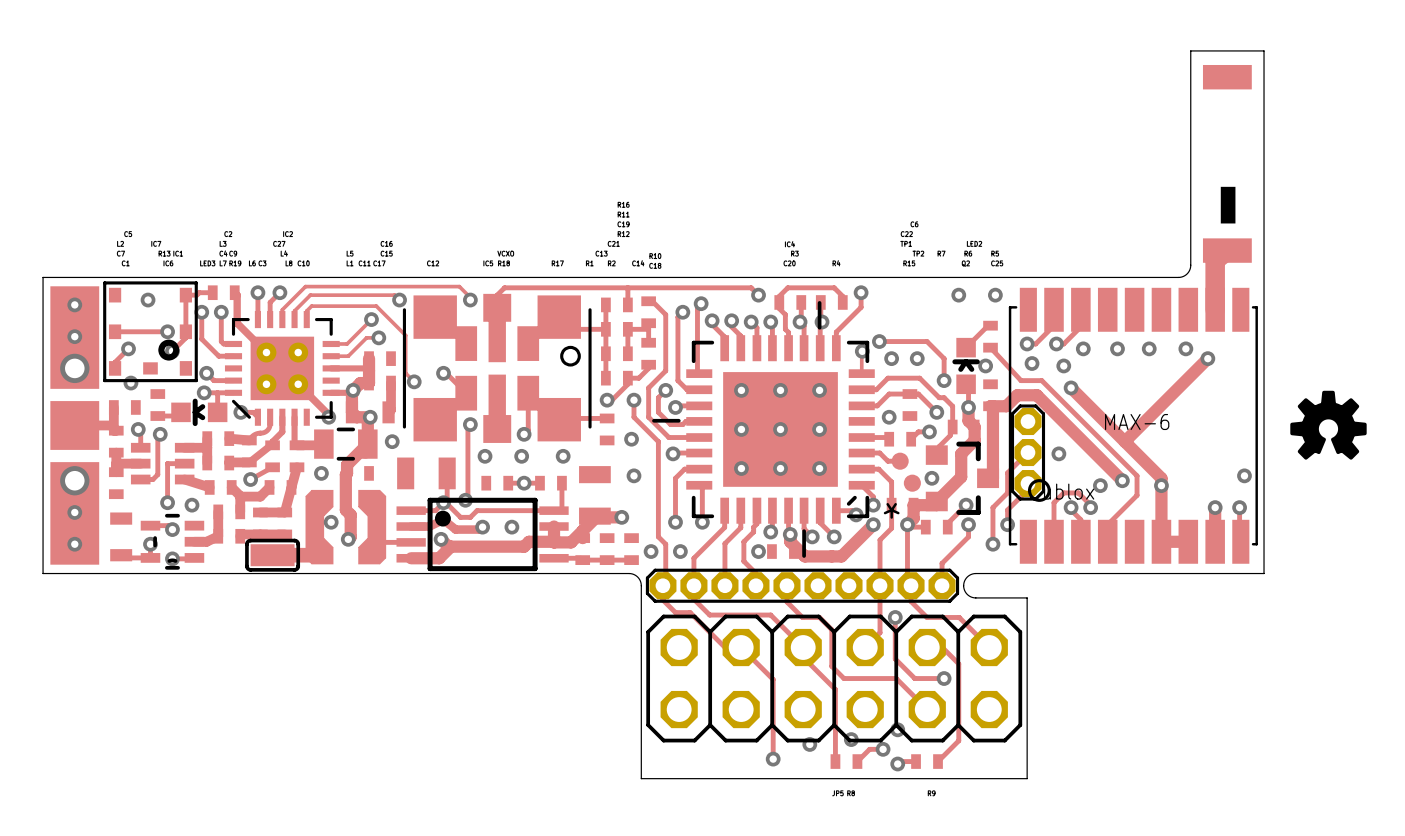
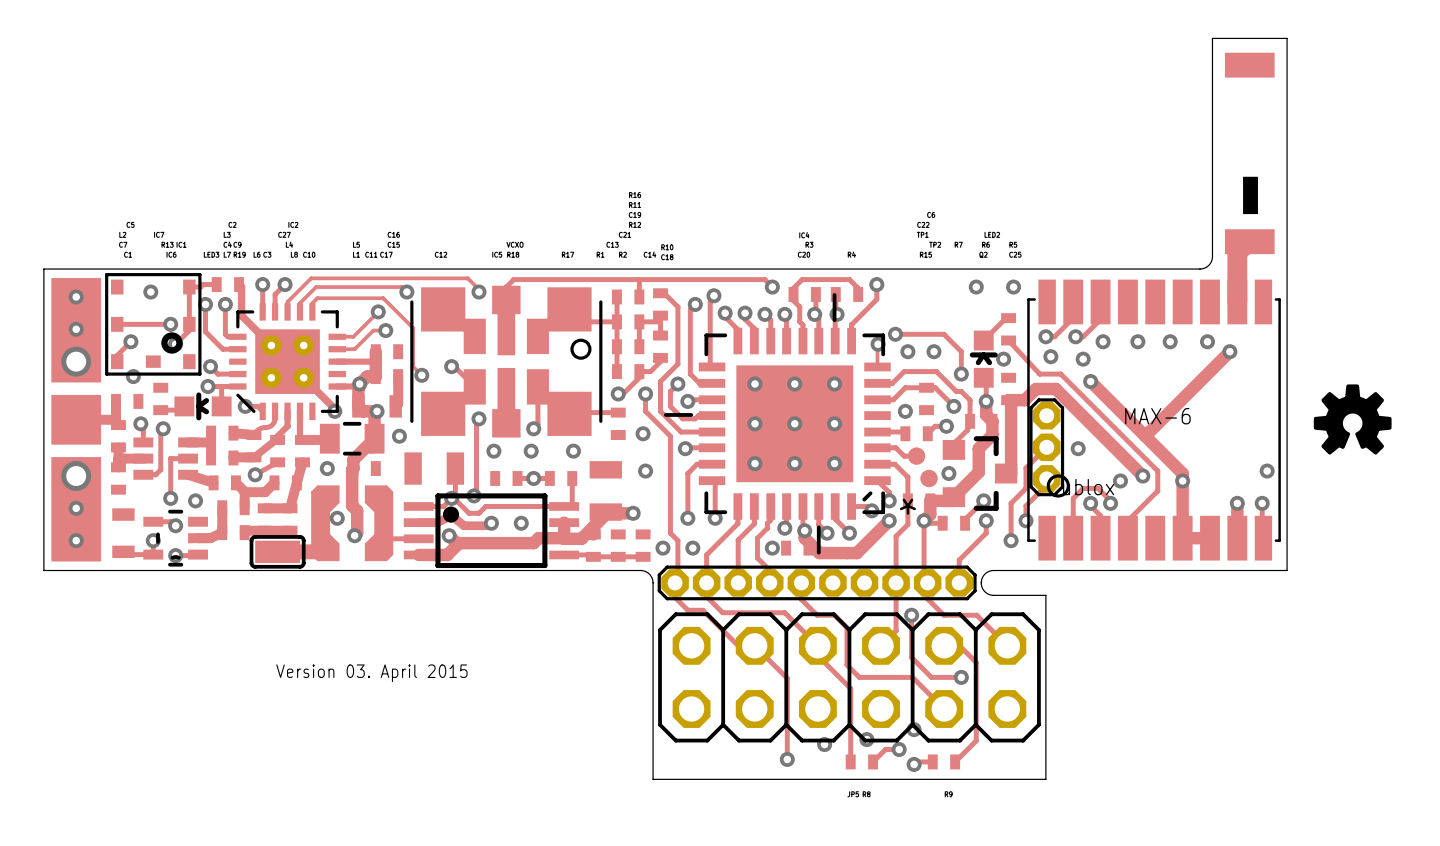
text: none -> Version 03. April 2015 (371, 673)

